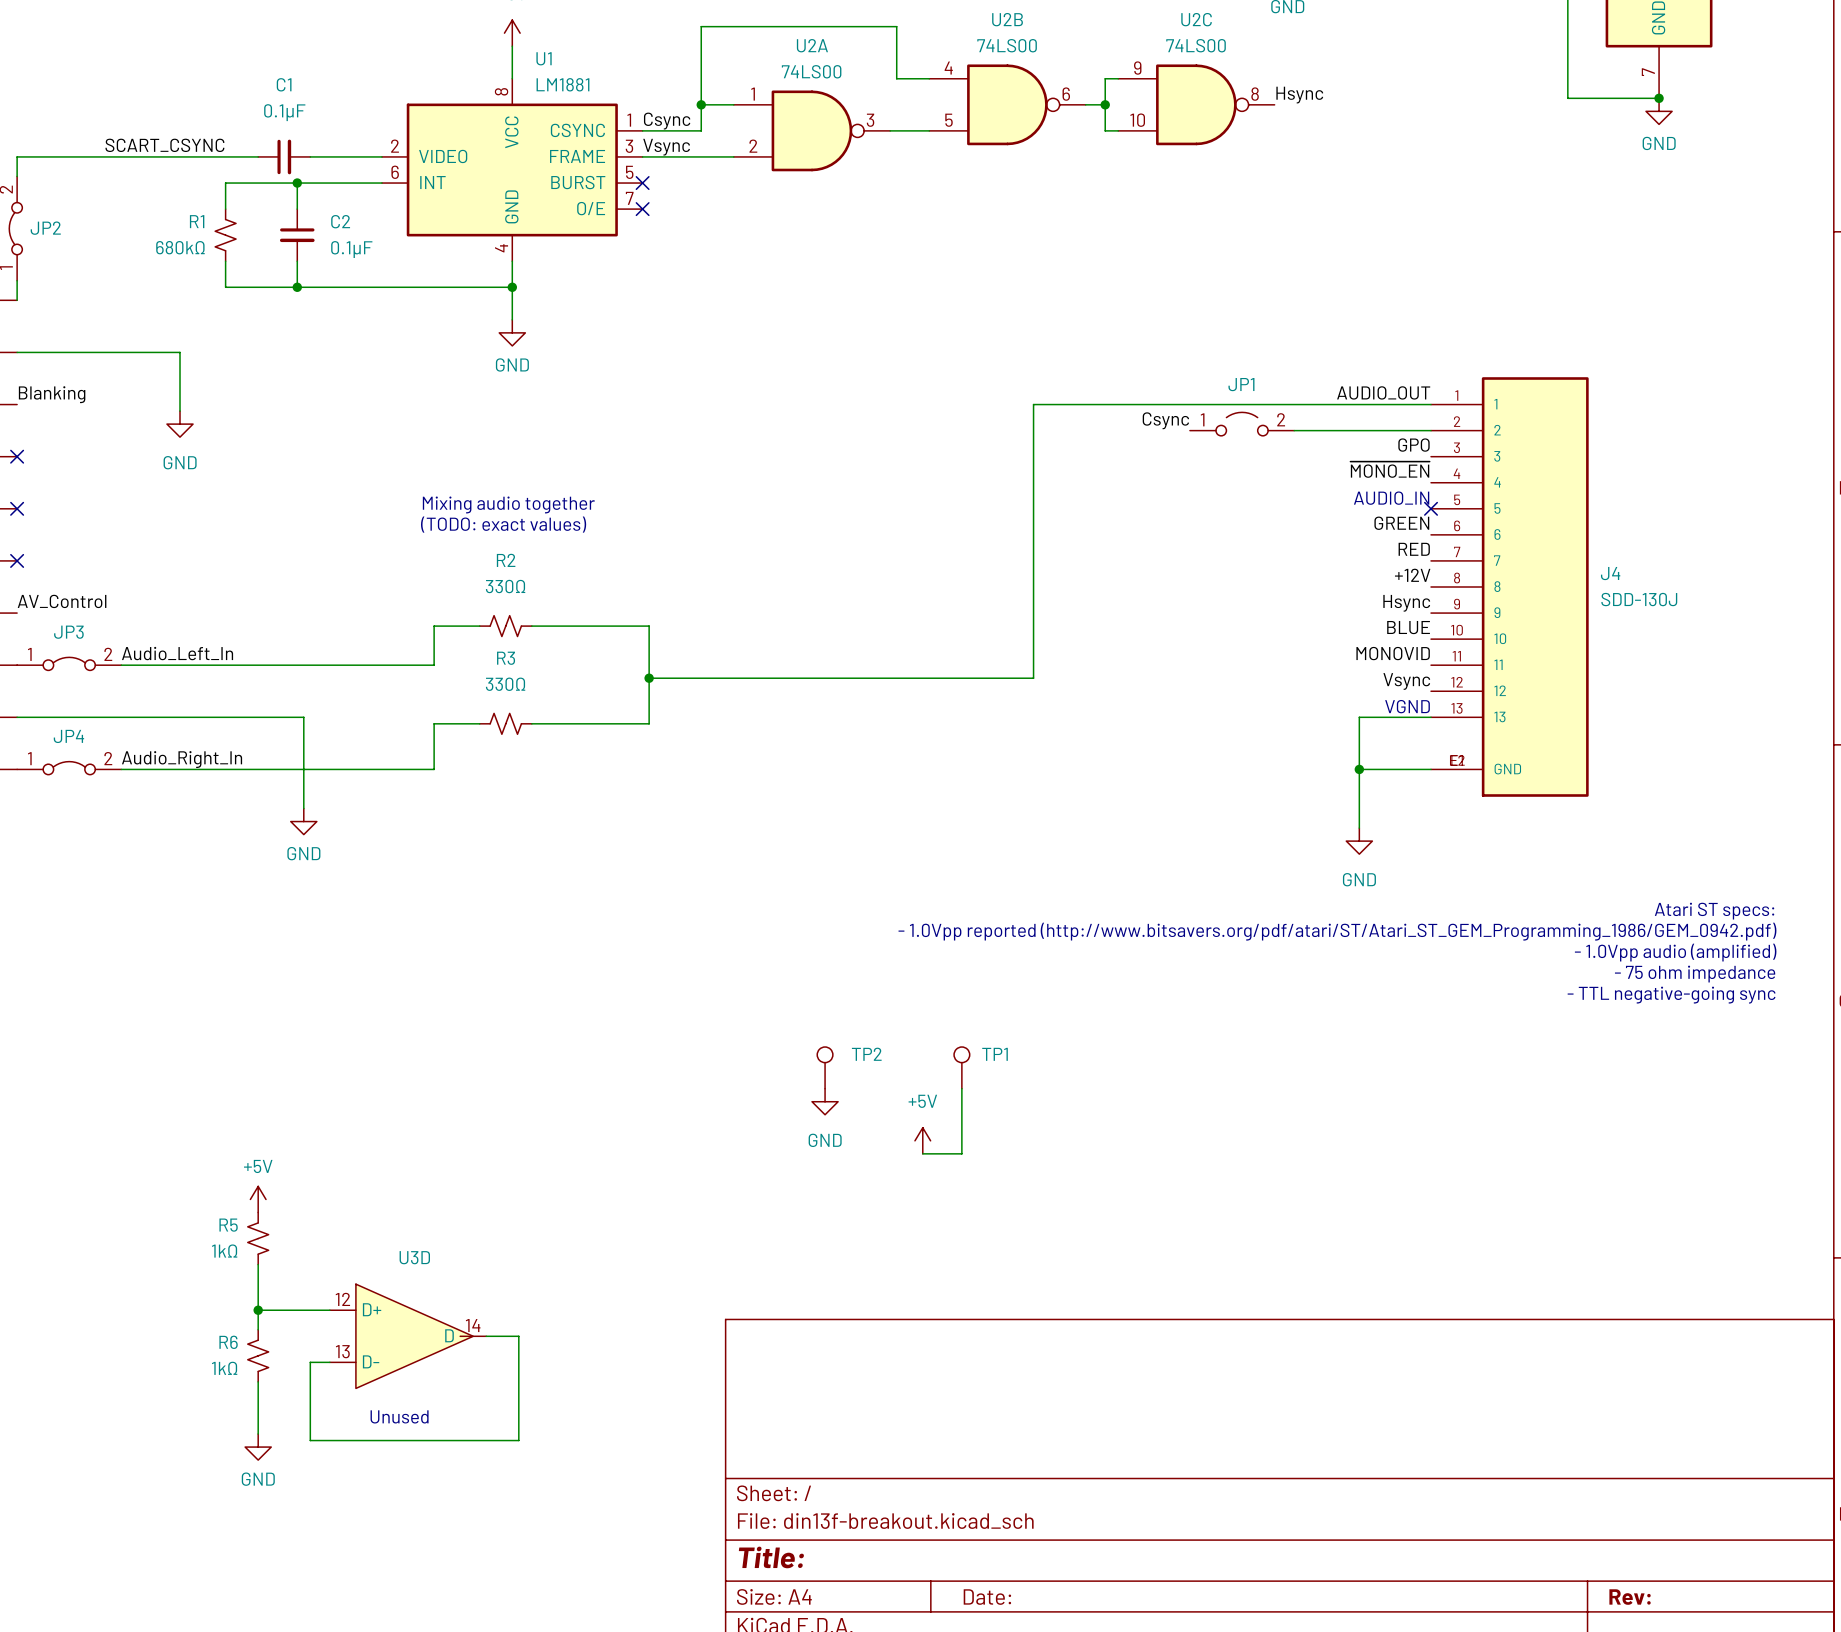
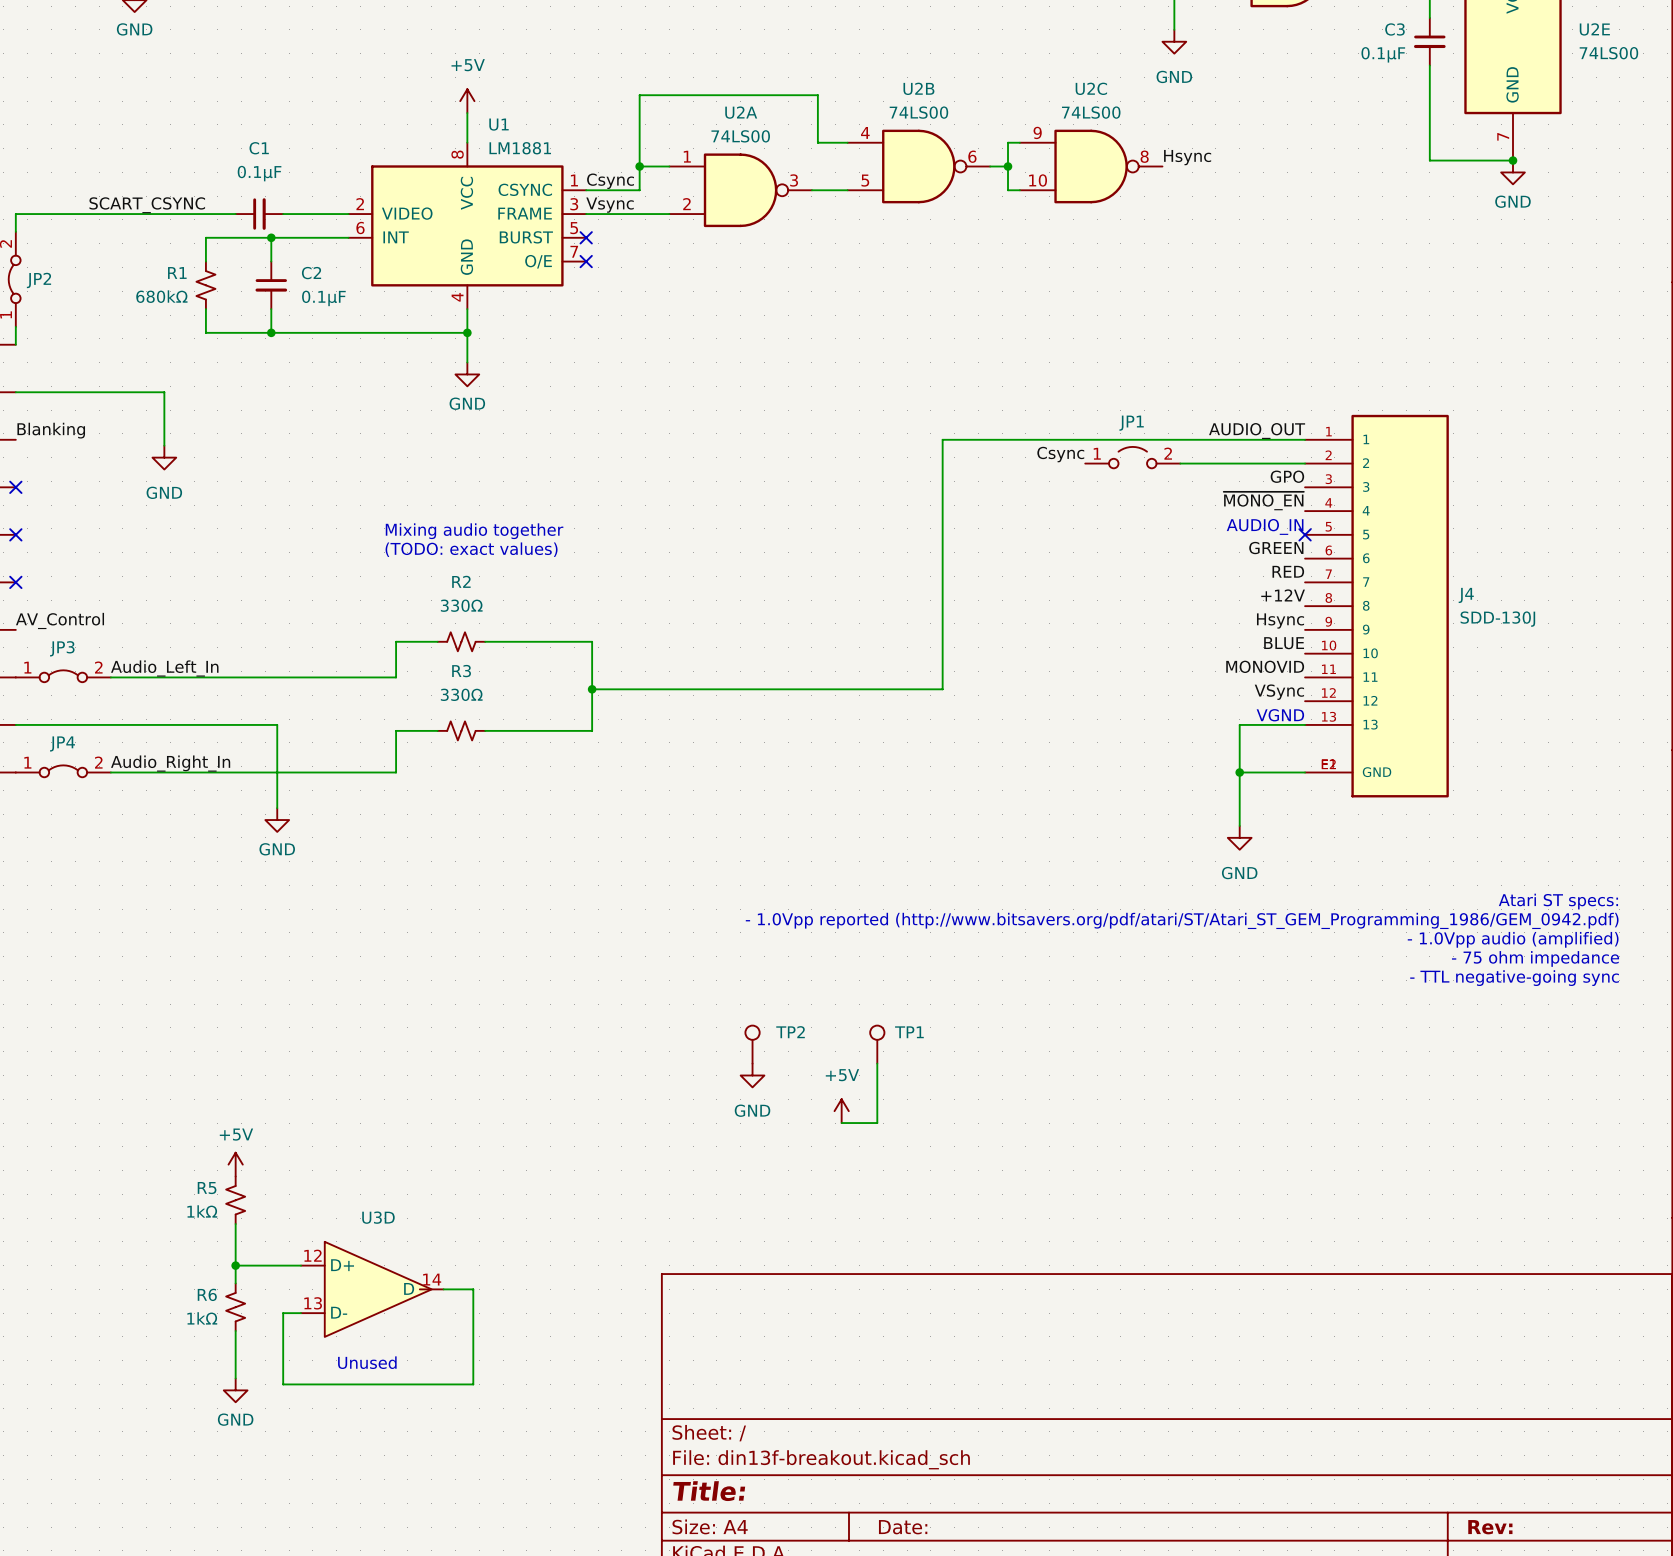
label: Vsync (1406, 681) -> VSync (1279, 692)

